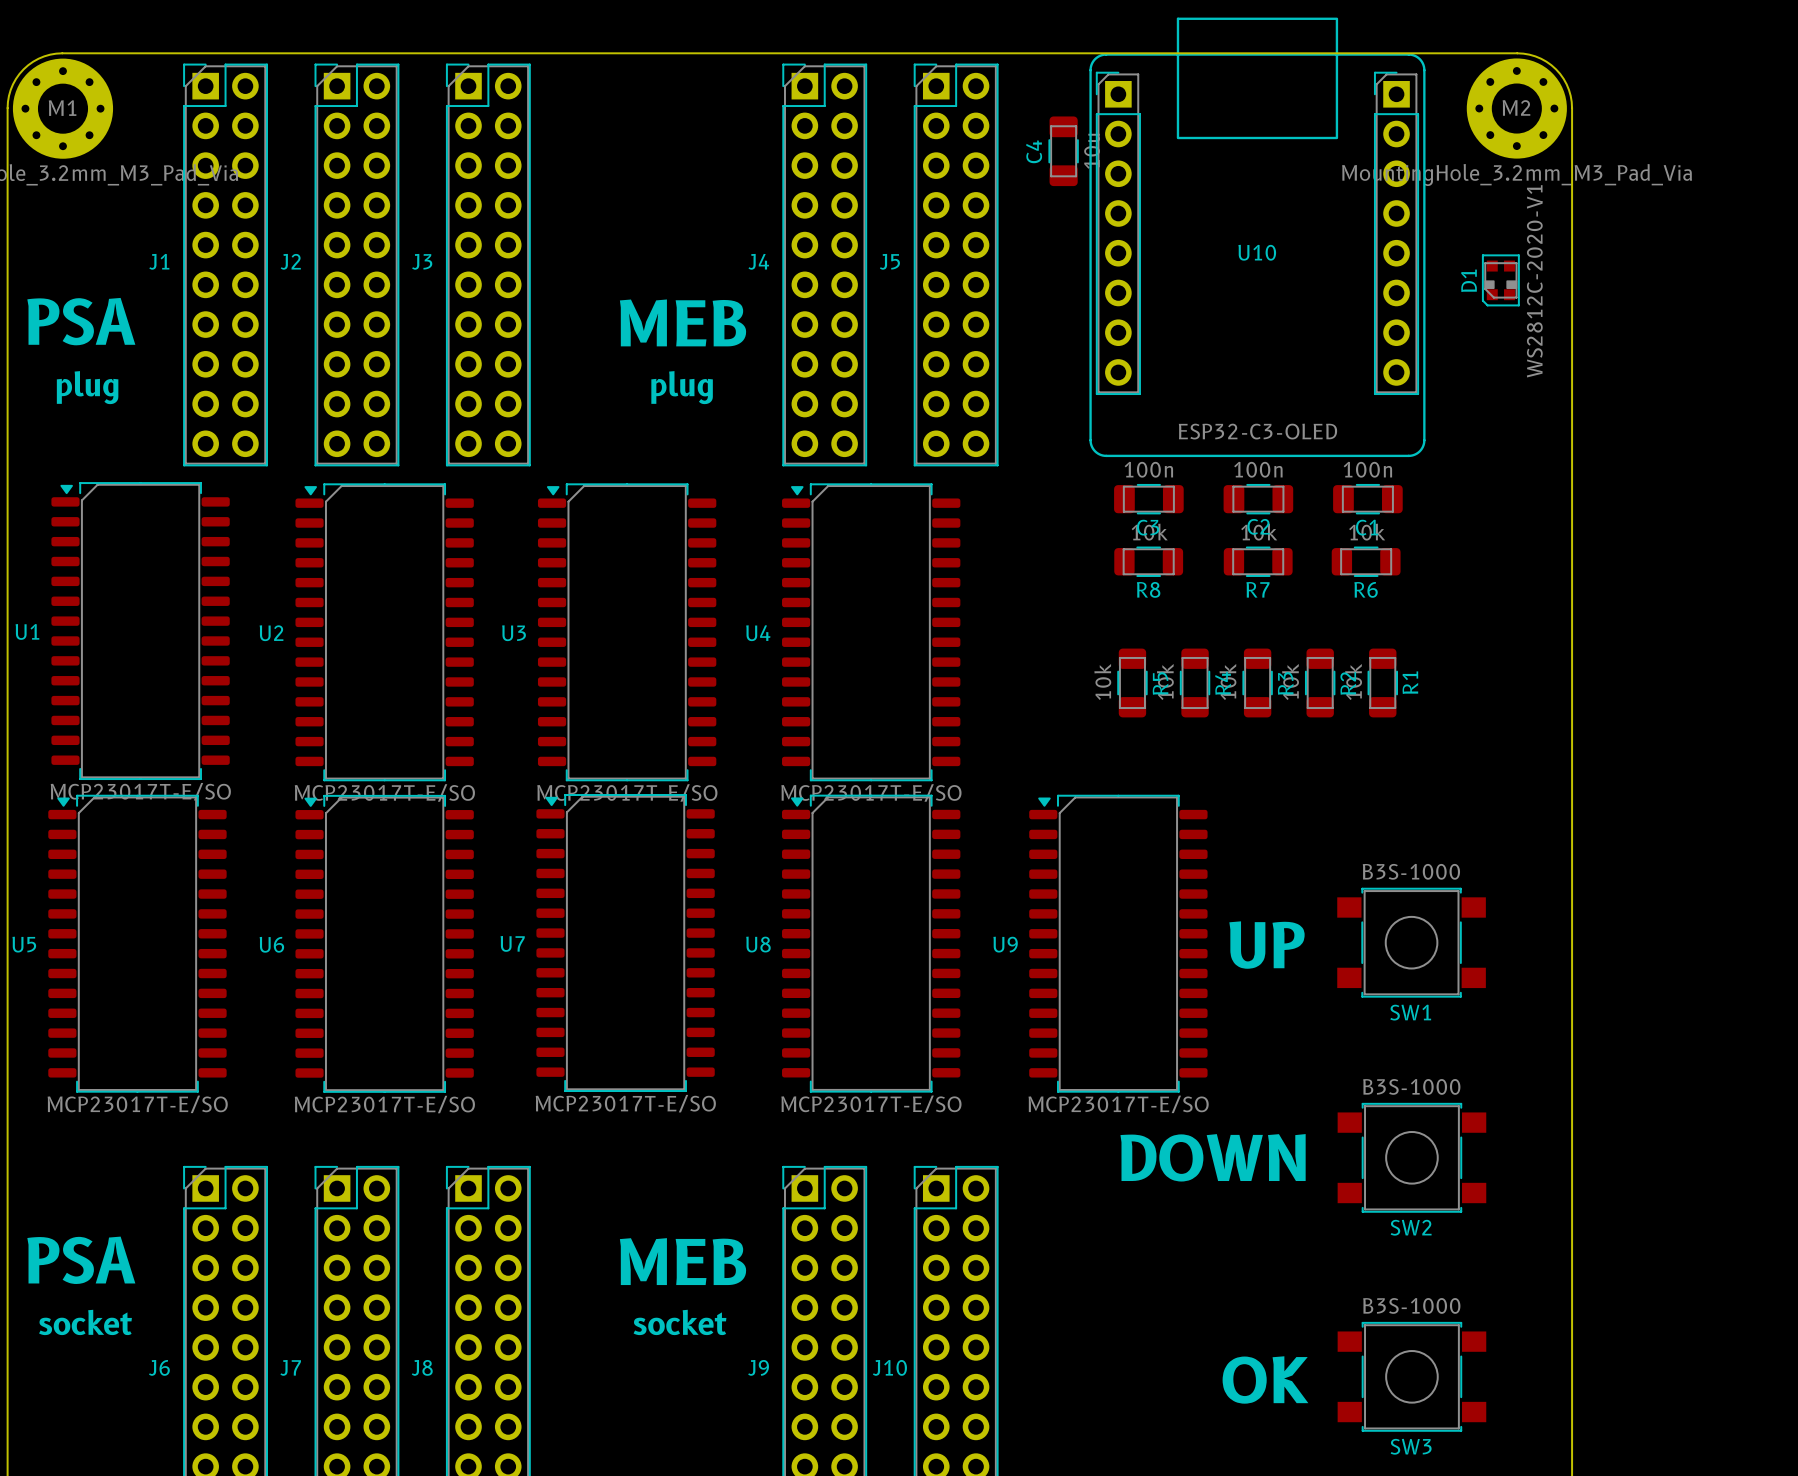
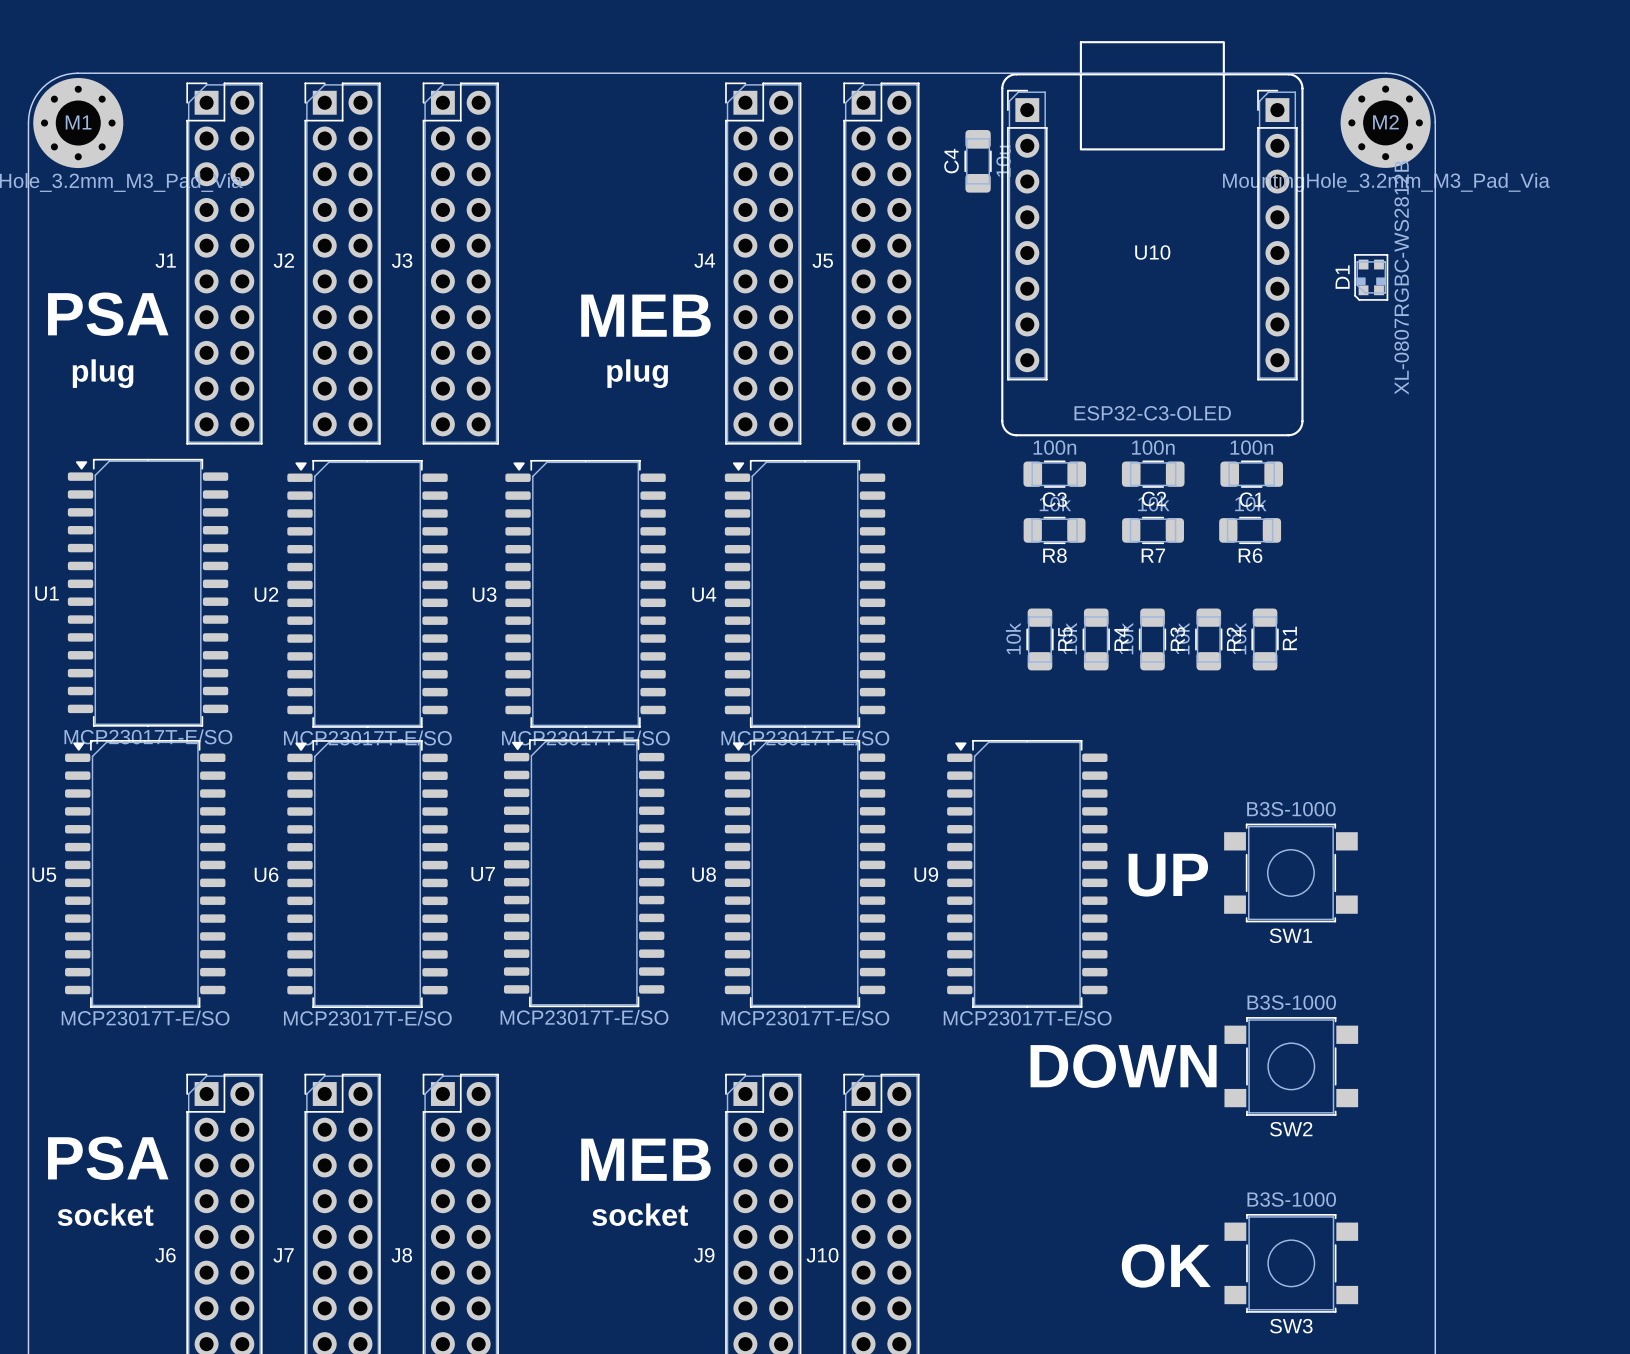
D1 value: WS2812C-2020-V1 (1534, 281) -> XL-0807RGBC-WS2812B (1401, 277)

